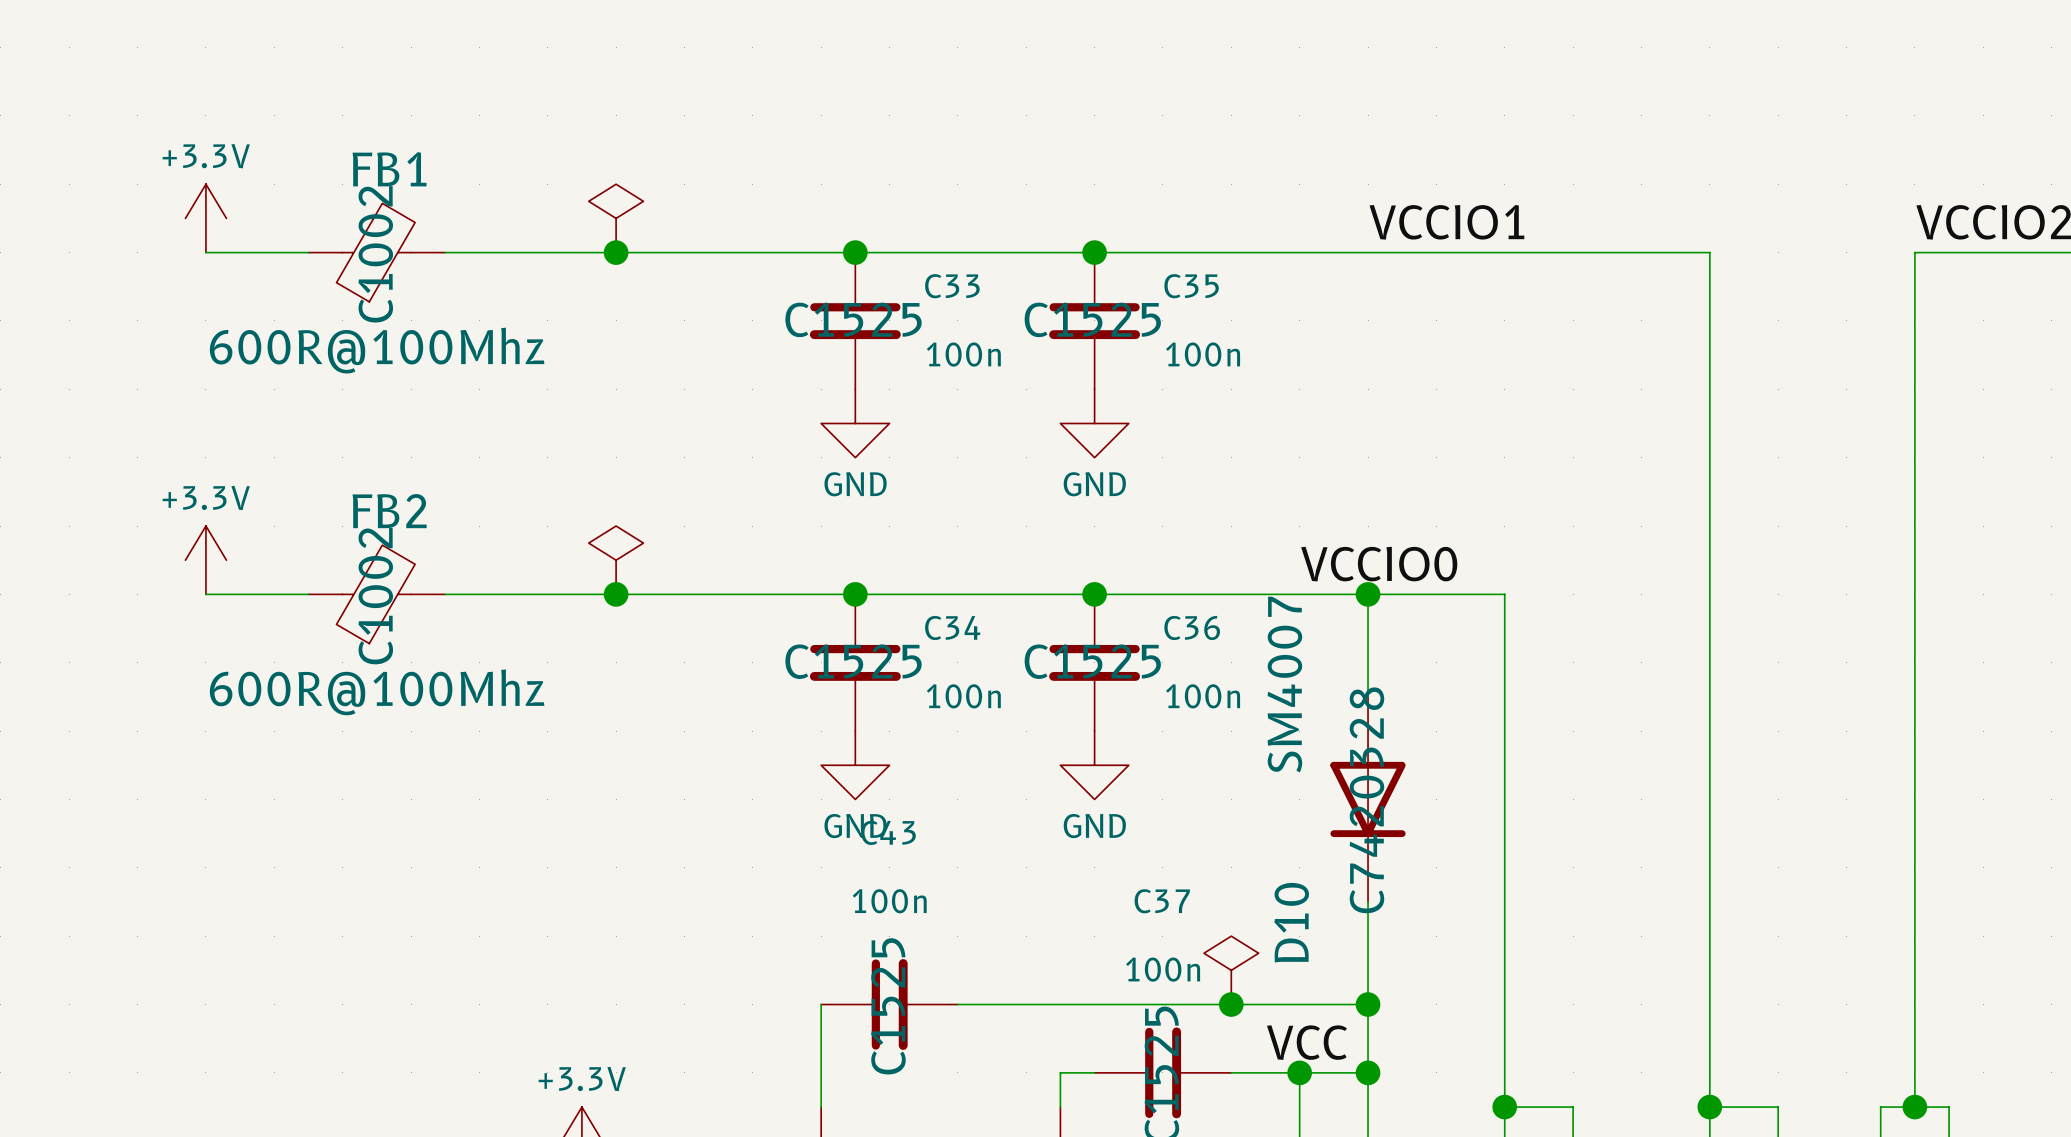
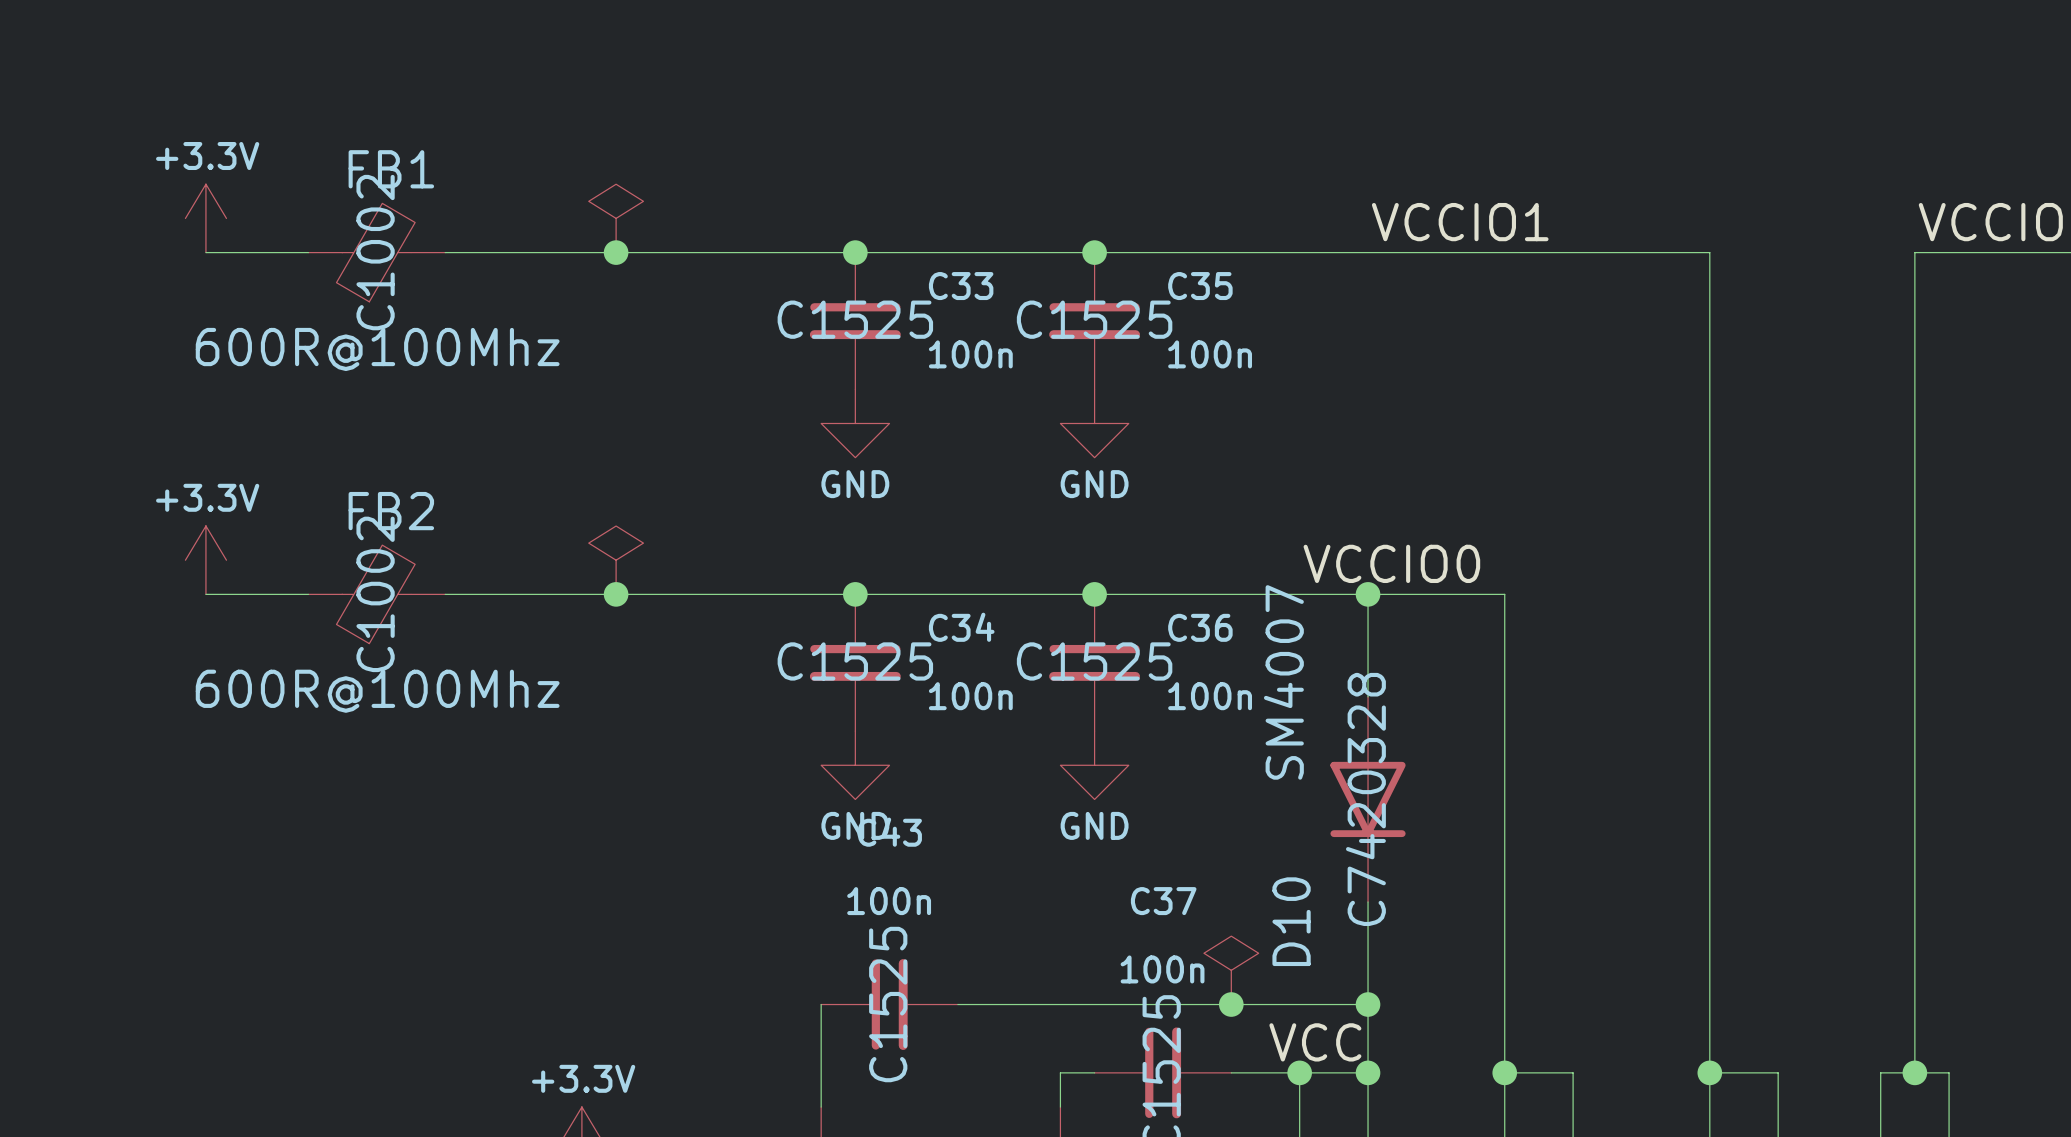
wire: (1914, 1072) (1914, 1107) -> none
wire: (1504, 1107) (1573, 1107) -> (1504, 1072) (1573, 1072) (1573, 1107)
junction position: (1504, 1107) -> (1504, 1072)
wire: (1709, 1107) (1778, 1107) -> (1709, 1072) (1778, 1072) (1778, 1107)
junction position: (1709, 1107) -> (1709, 1072)
wire: (1880, 1107) (1949, 1107) -> (1880, 1107) (1880, 1072) (1949, 1072) (1949, 1107)
junction position: (1914, 1107) -> (1914, 1072)

